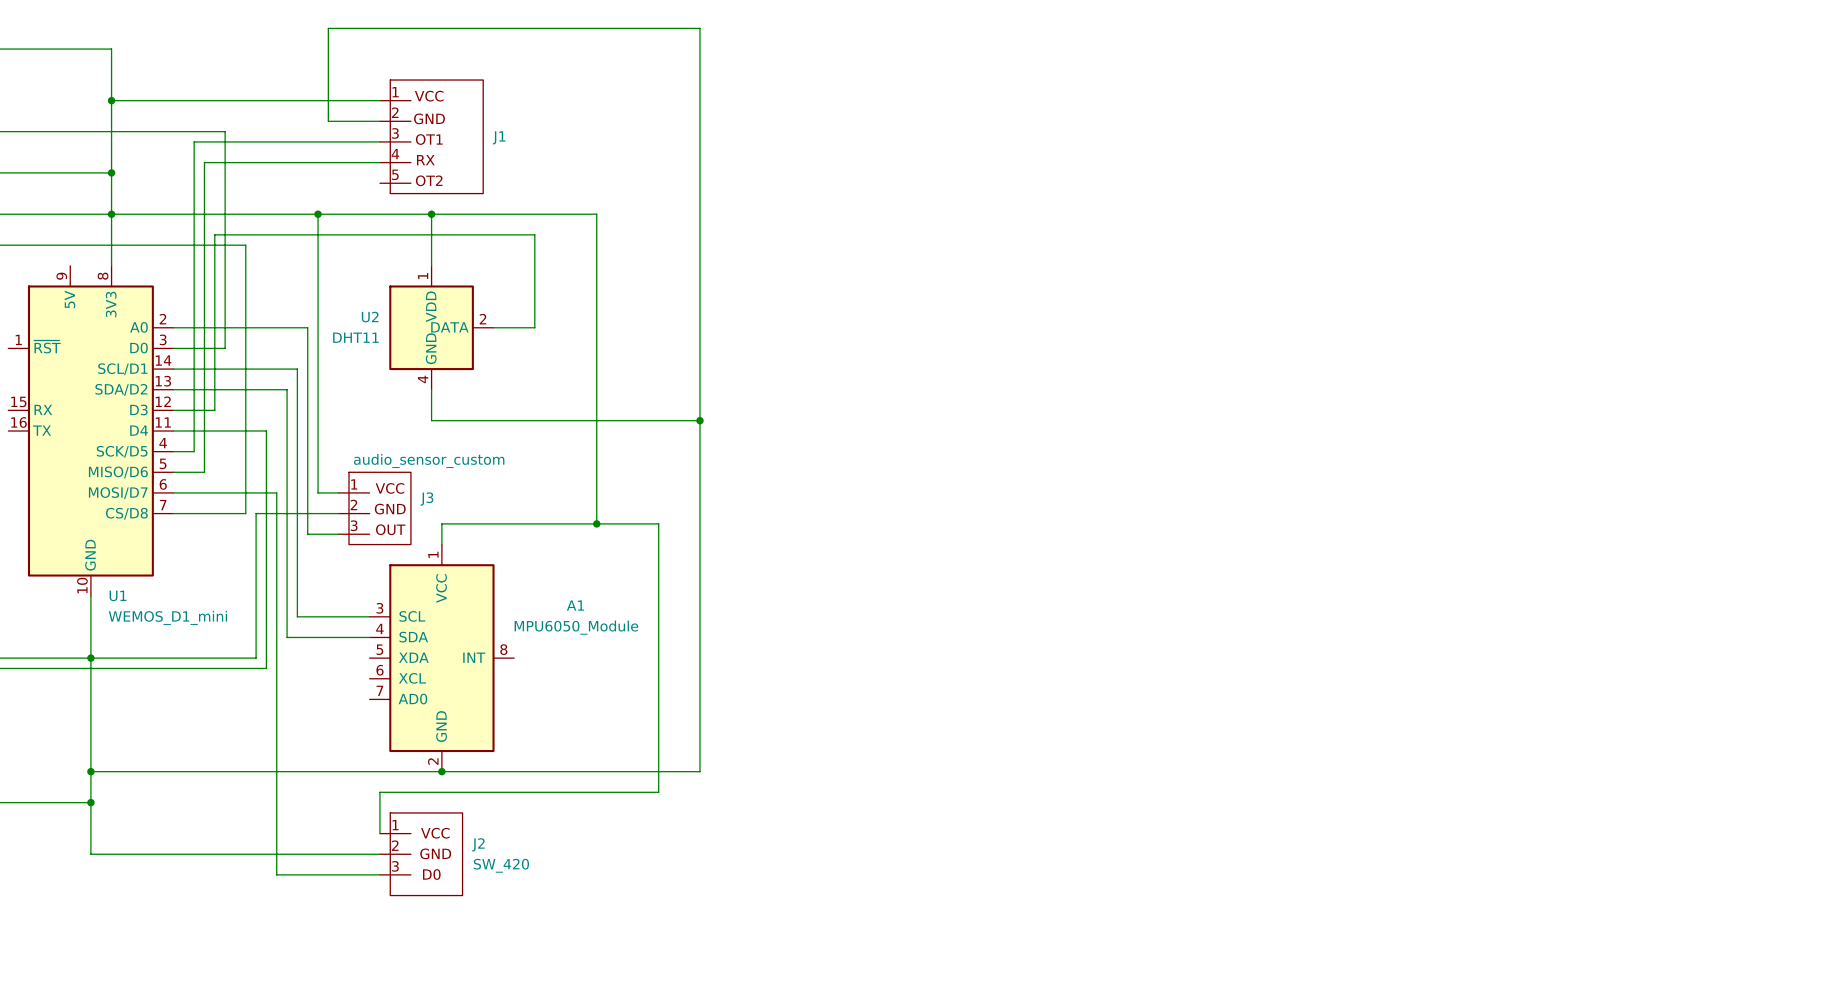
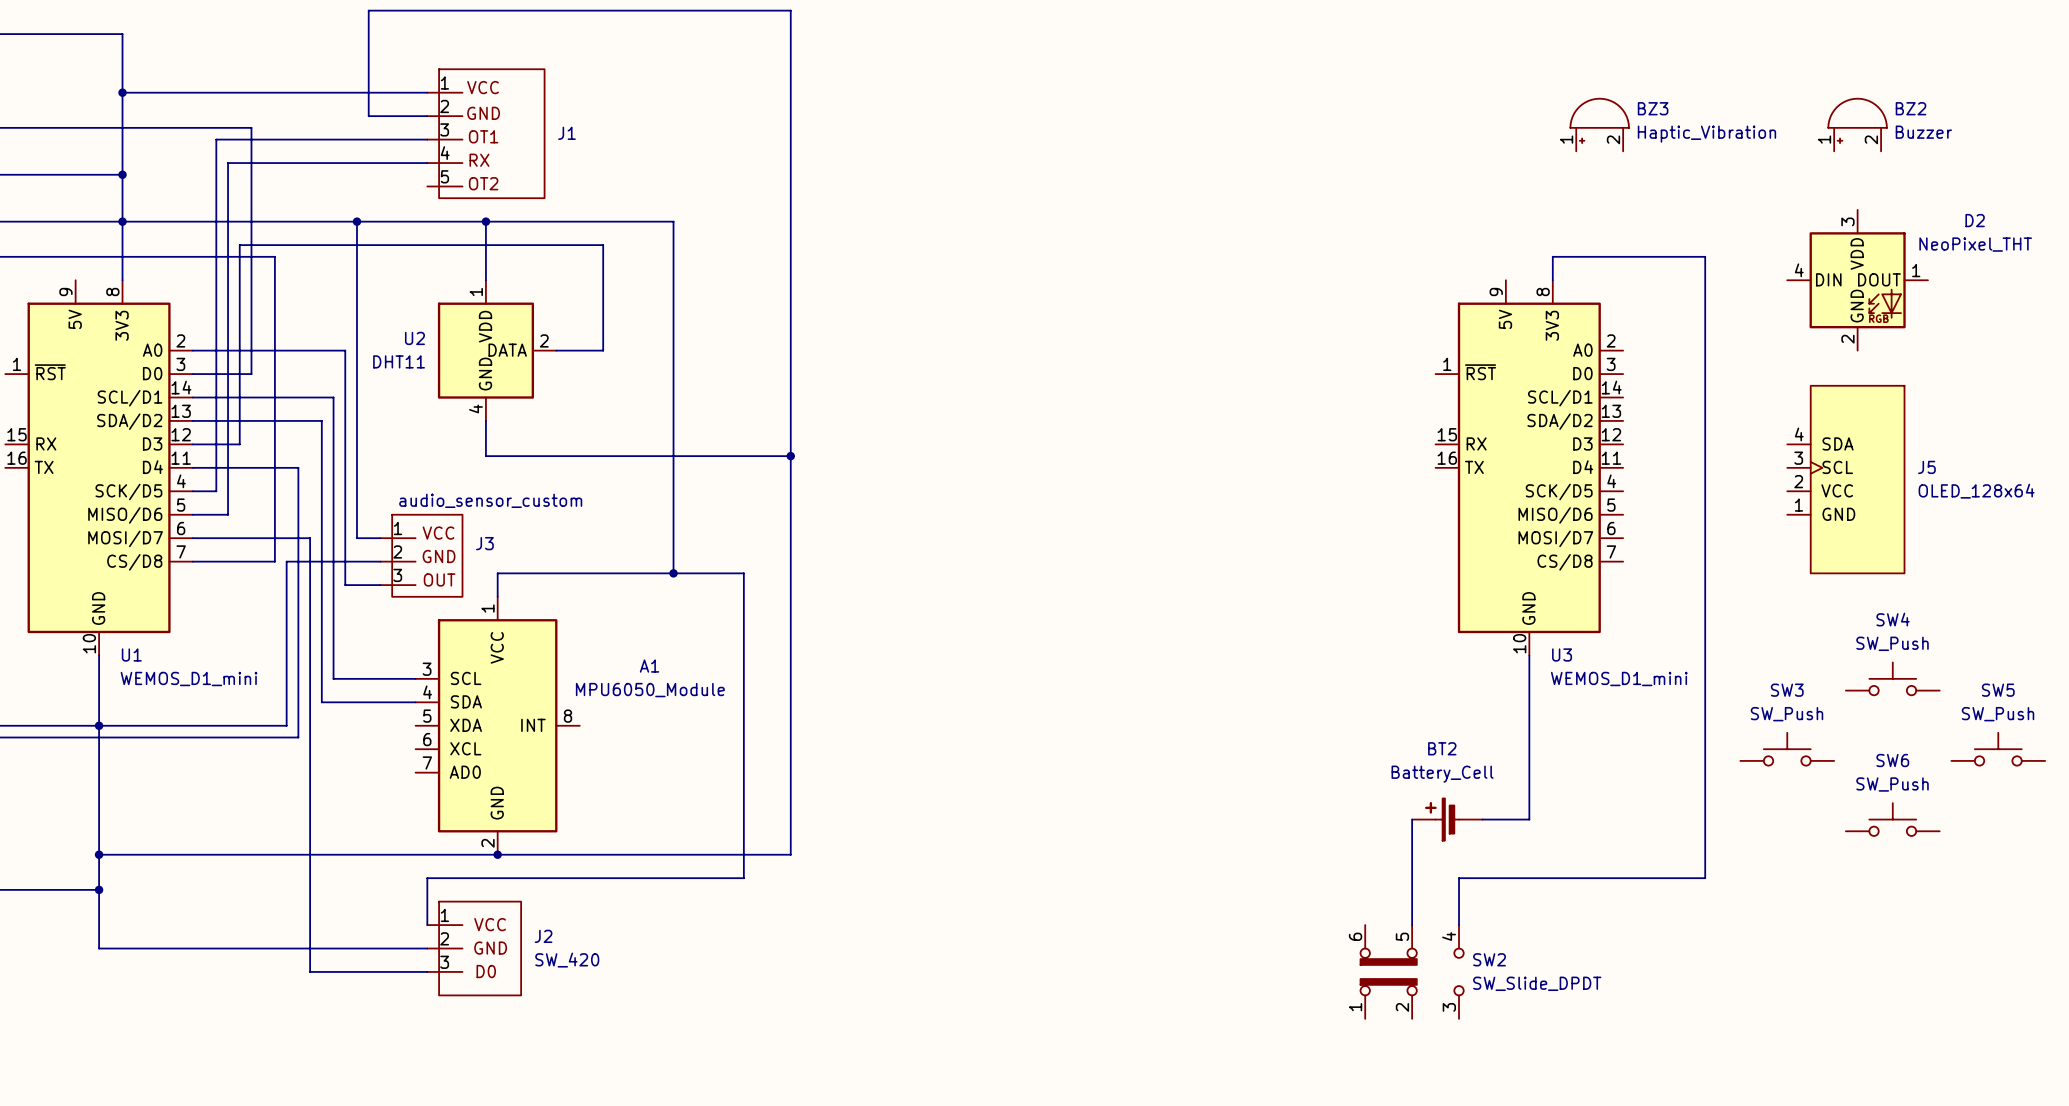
BZ3: none -> Haptic_Vibration (1599, 125)
BZ2: none -> Buzzer (1857, 125)
wire: none -> (1552, 280) (1552, 256) (1705, 256) (1705, 878) (1459, 878) (1459, 925)
D2: none -> NeoPixel_THT (1857, 280)
U3: none -> WEMOS_D1_mini (1529, 467)
J5: none -> OLED_128x64 (1845, 479)
wire: none -> (1529, 655) (1529, 819) (1482, 819)
SW4: none -> SW_Push (1892, 678)
SW3: none -> SW_Push (1787, 749)
SW5: none -> SW_Push (1998, 749)
wire: none -> (1412, 819) (1412, 925)
BT2: none -> Battery_Cell (1447, 819)
SW6: none -> SW_Push (1892, 819)
SW2: none -> SW_Slide_DPDT (1412, 971)

